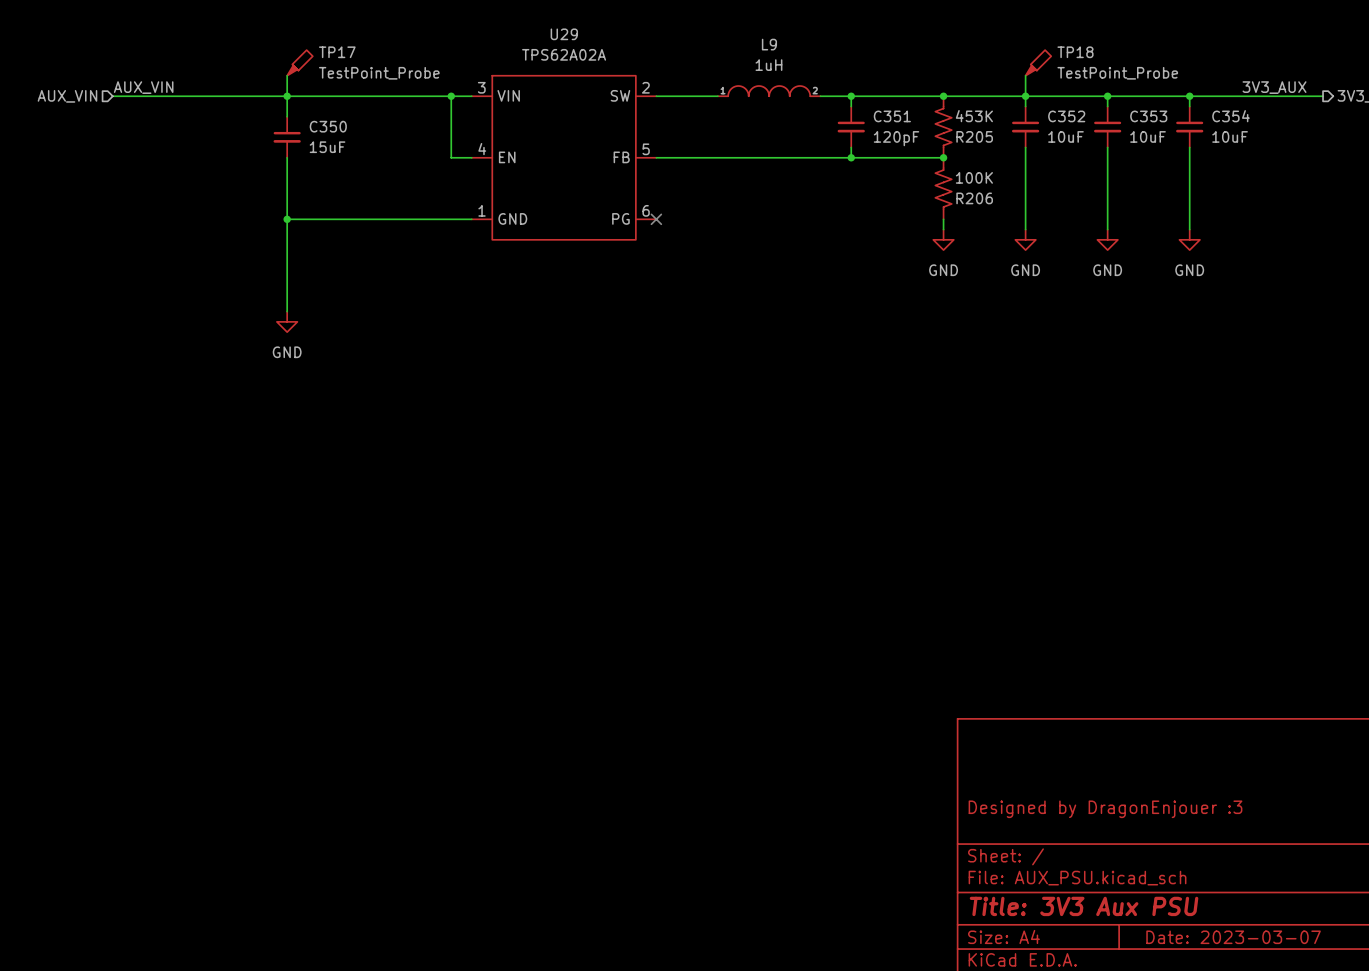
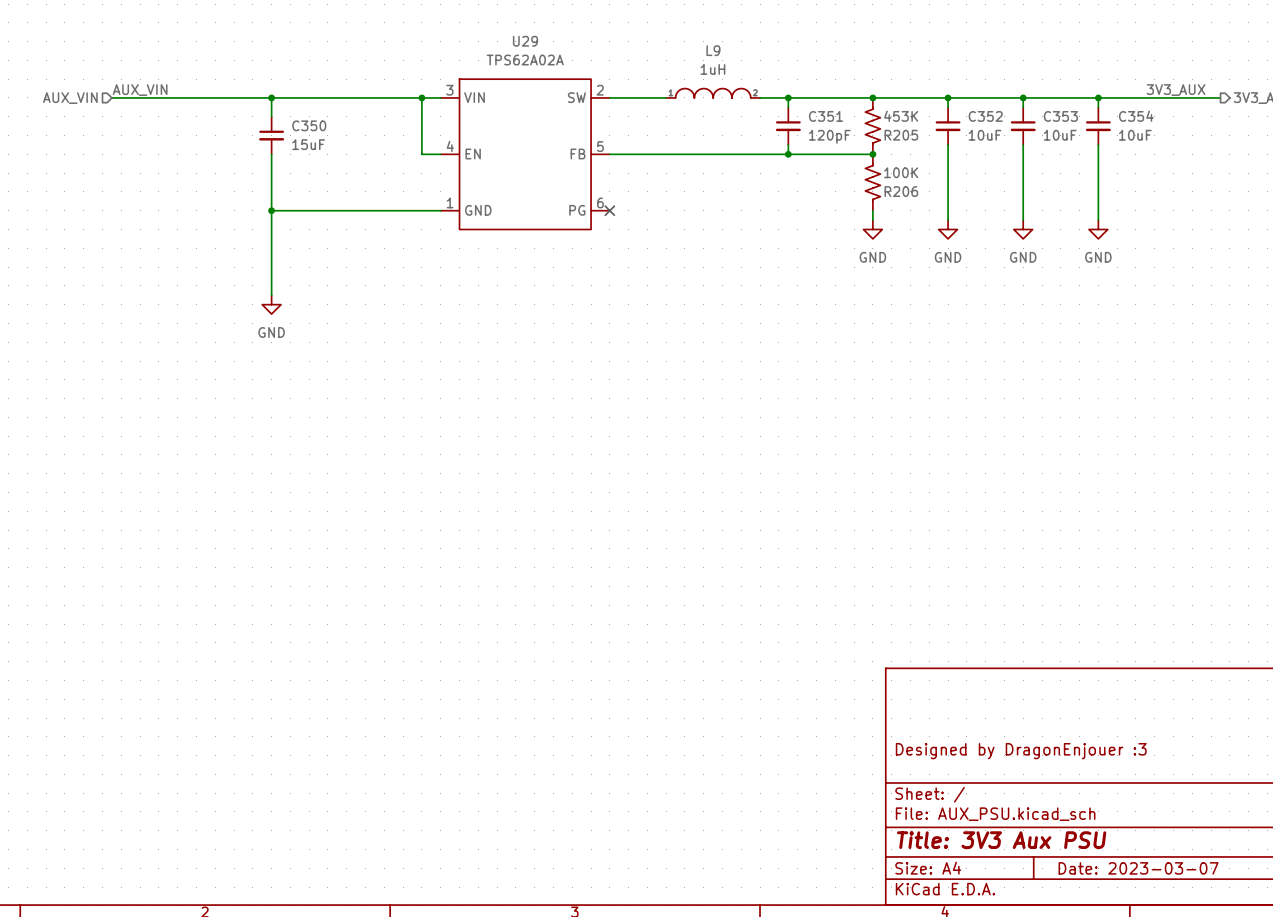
TP17: TestPoint_Probe (299, 62) -> none
TP18: TestPoint_Probe (1038, 62) -> none
wire: (287, 75) (287, 96) -> none
wire: (1025, 75) (1025, 96) -> none

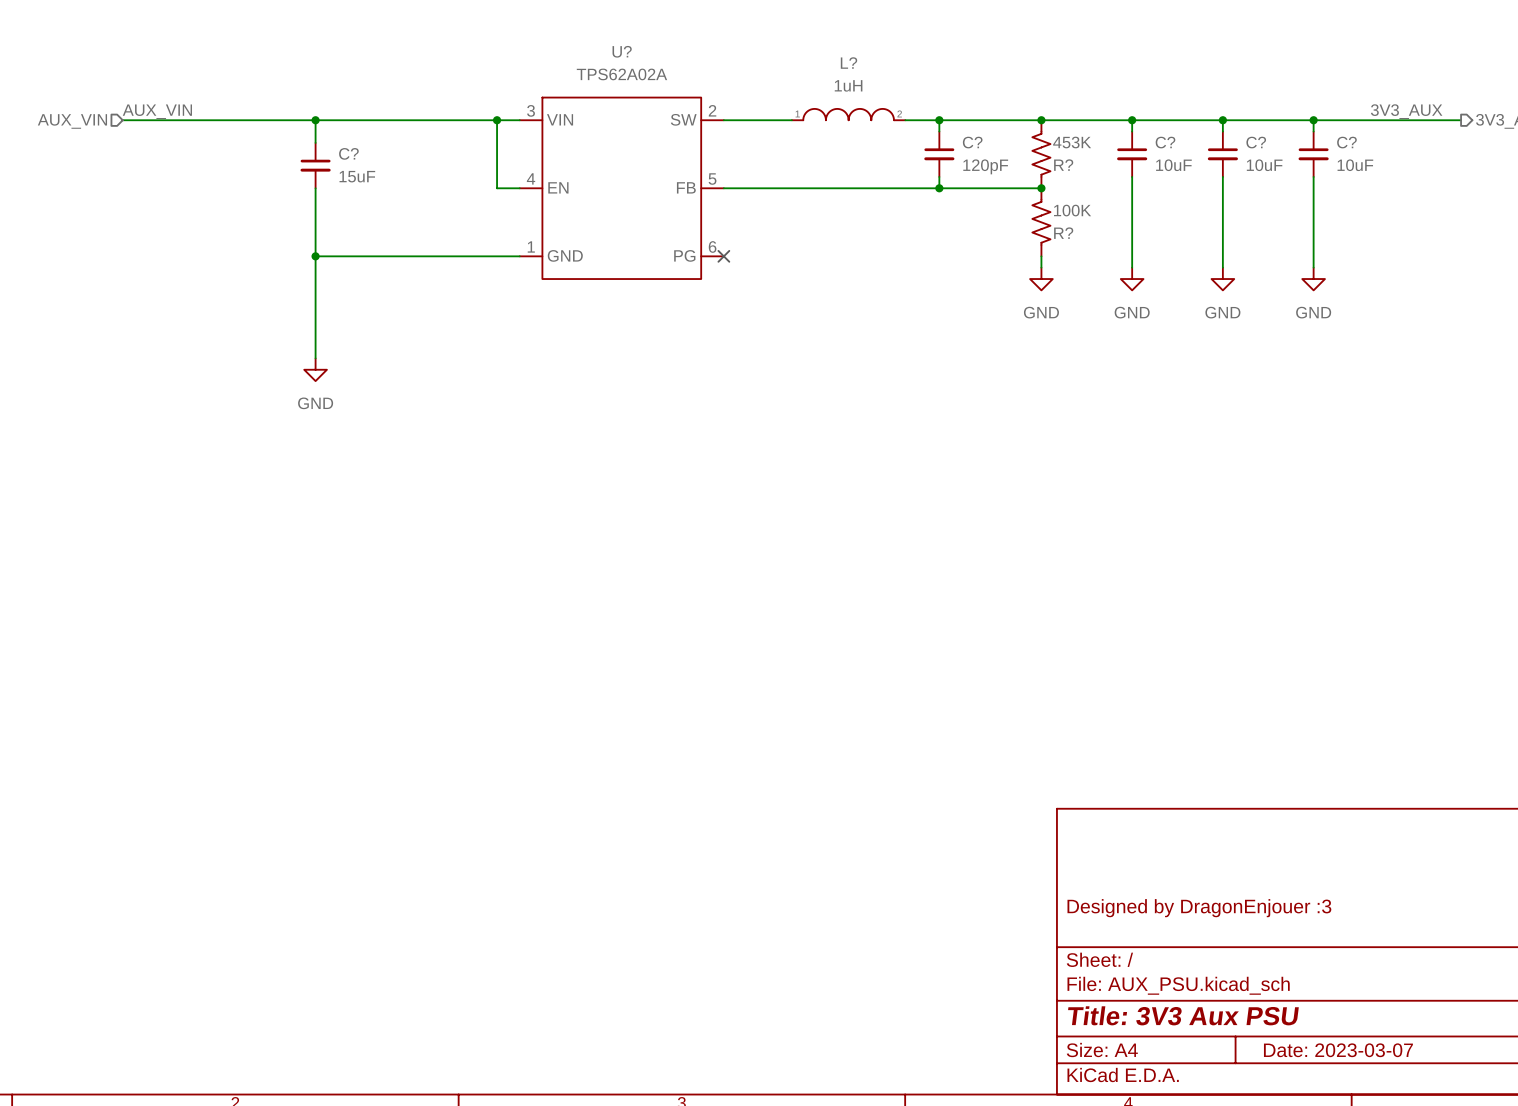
U29 name: U29 (525, 41) -> U? (622, 51)
L9 name: L9 (713, 50) -> L? (848, 63)
C351 name: C351 (825, 116) -> C? (972, 142)
C352 name: C352 (985, 116) -> C? (1165, 142)
C353 name: C353 (1060, 116) -> C? (1256, 142)
C354 name: C354 (1136, 116) -> C? (1346, 142)
C350 name: C350 (309, 125) -> C? (348, 153)
R205 name: R205 (901, 135) -> R? (1063, 165)
R206 name: R206 (901, 191) -> R? (1063, 233)

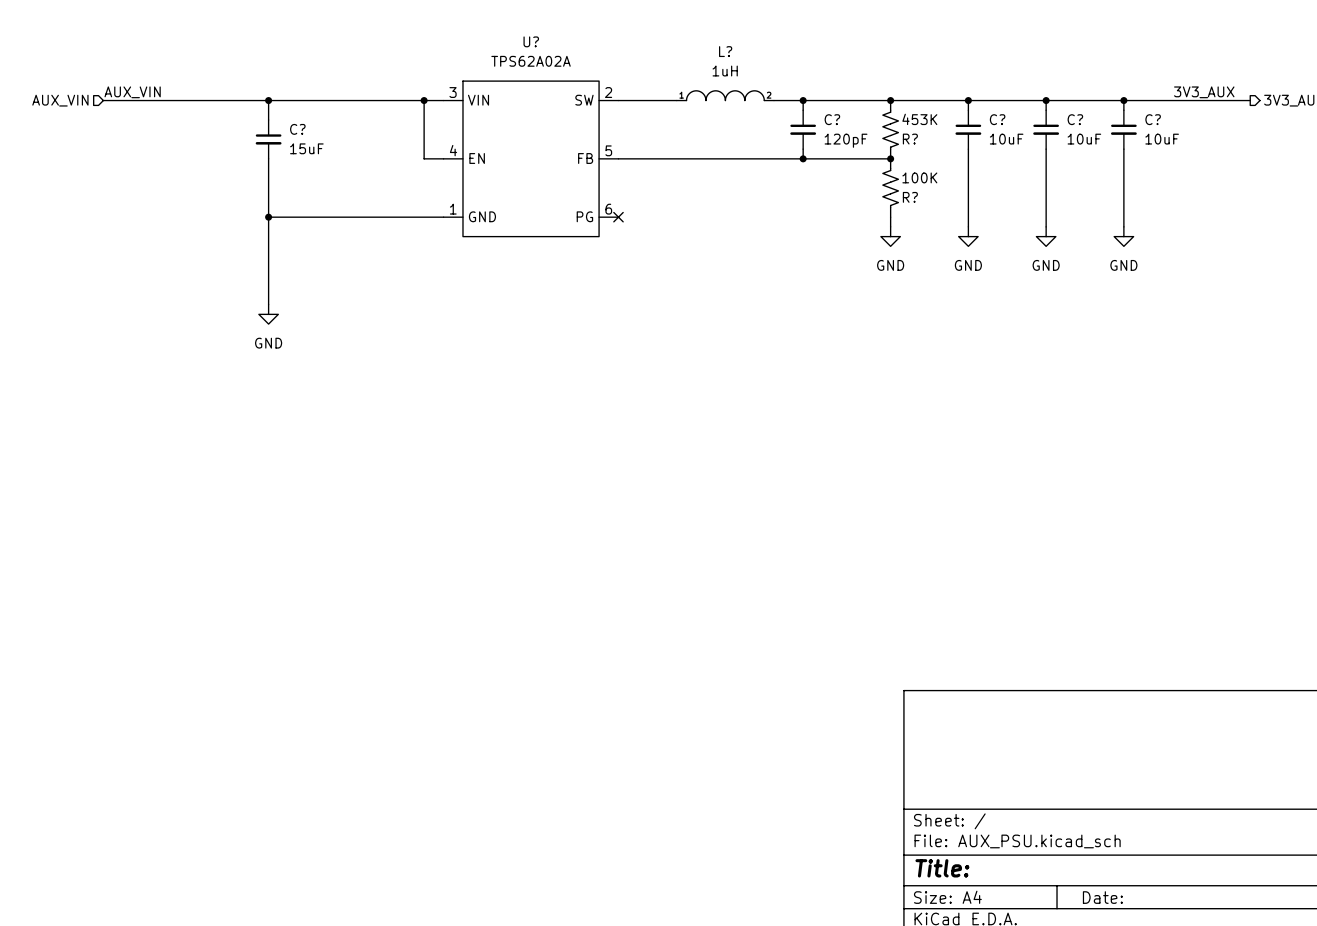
title block: Designed by DragonEnjouer :3 (1199, 908) -> none
title block: Title: 3V3 Aux PSU (1183, 1015) -> Title: (942, 868)
title block: Date: 2023-03-07 (1338, 1050) -> Date: (1102, 897)

